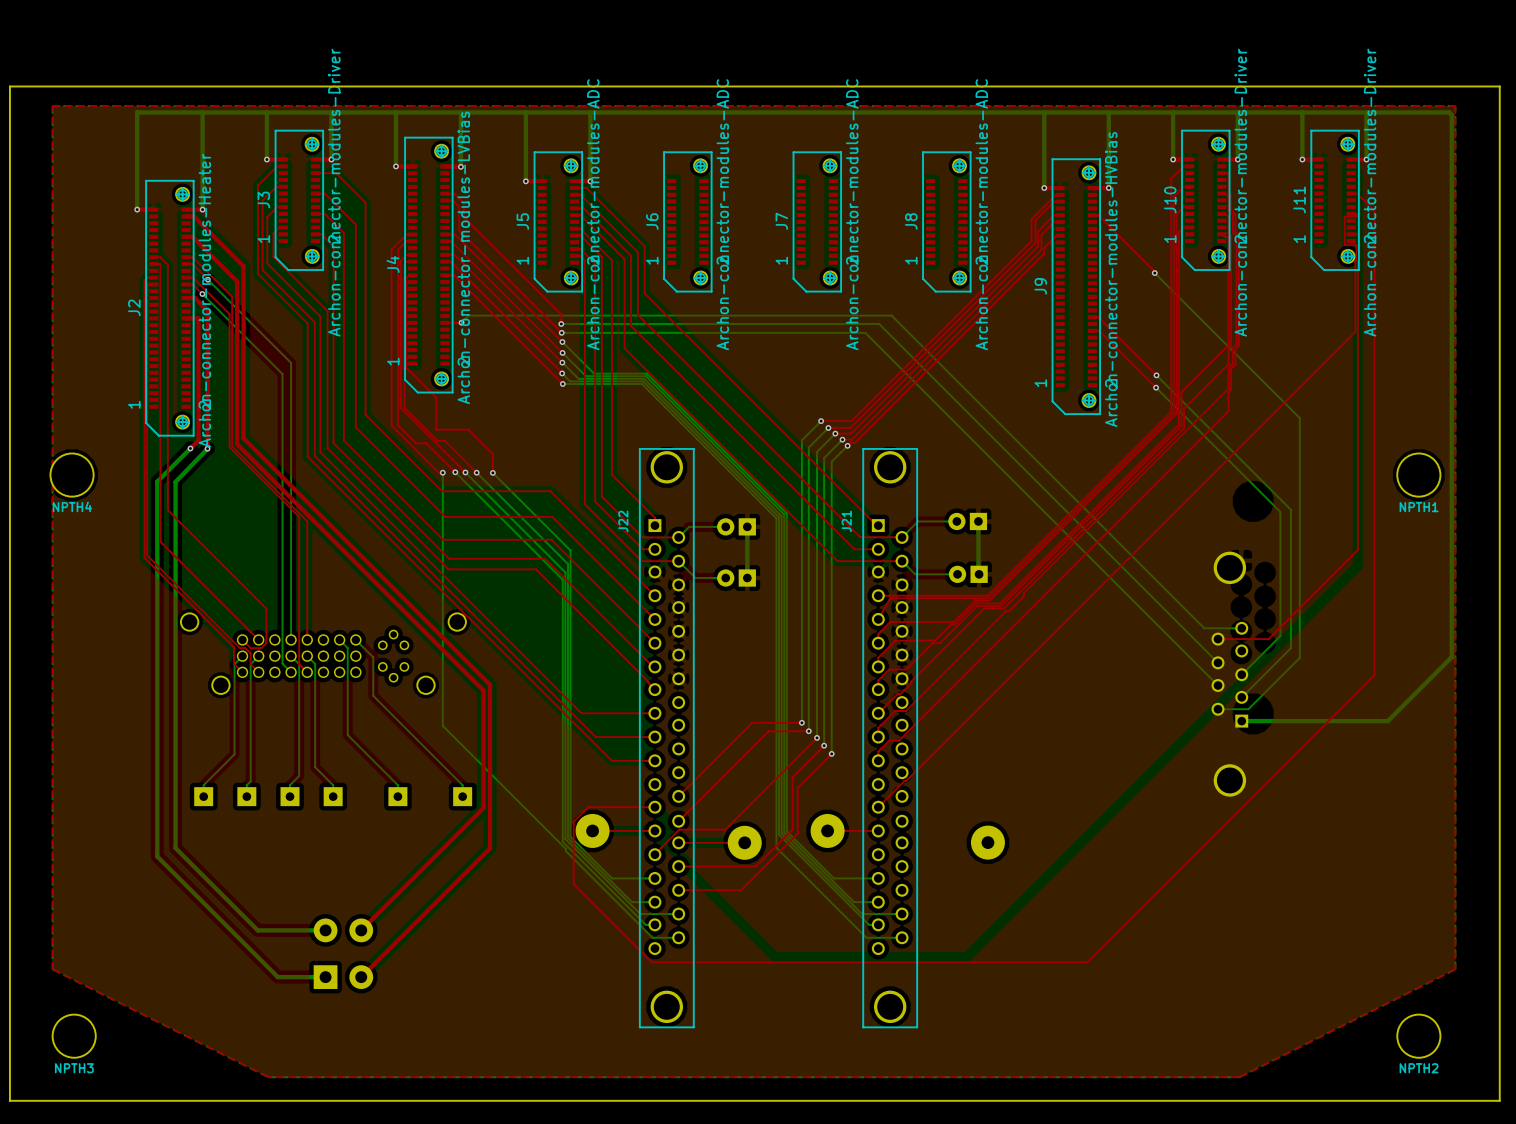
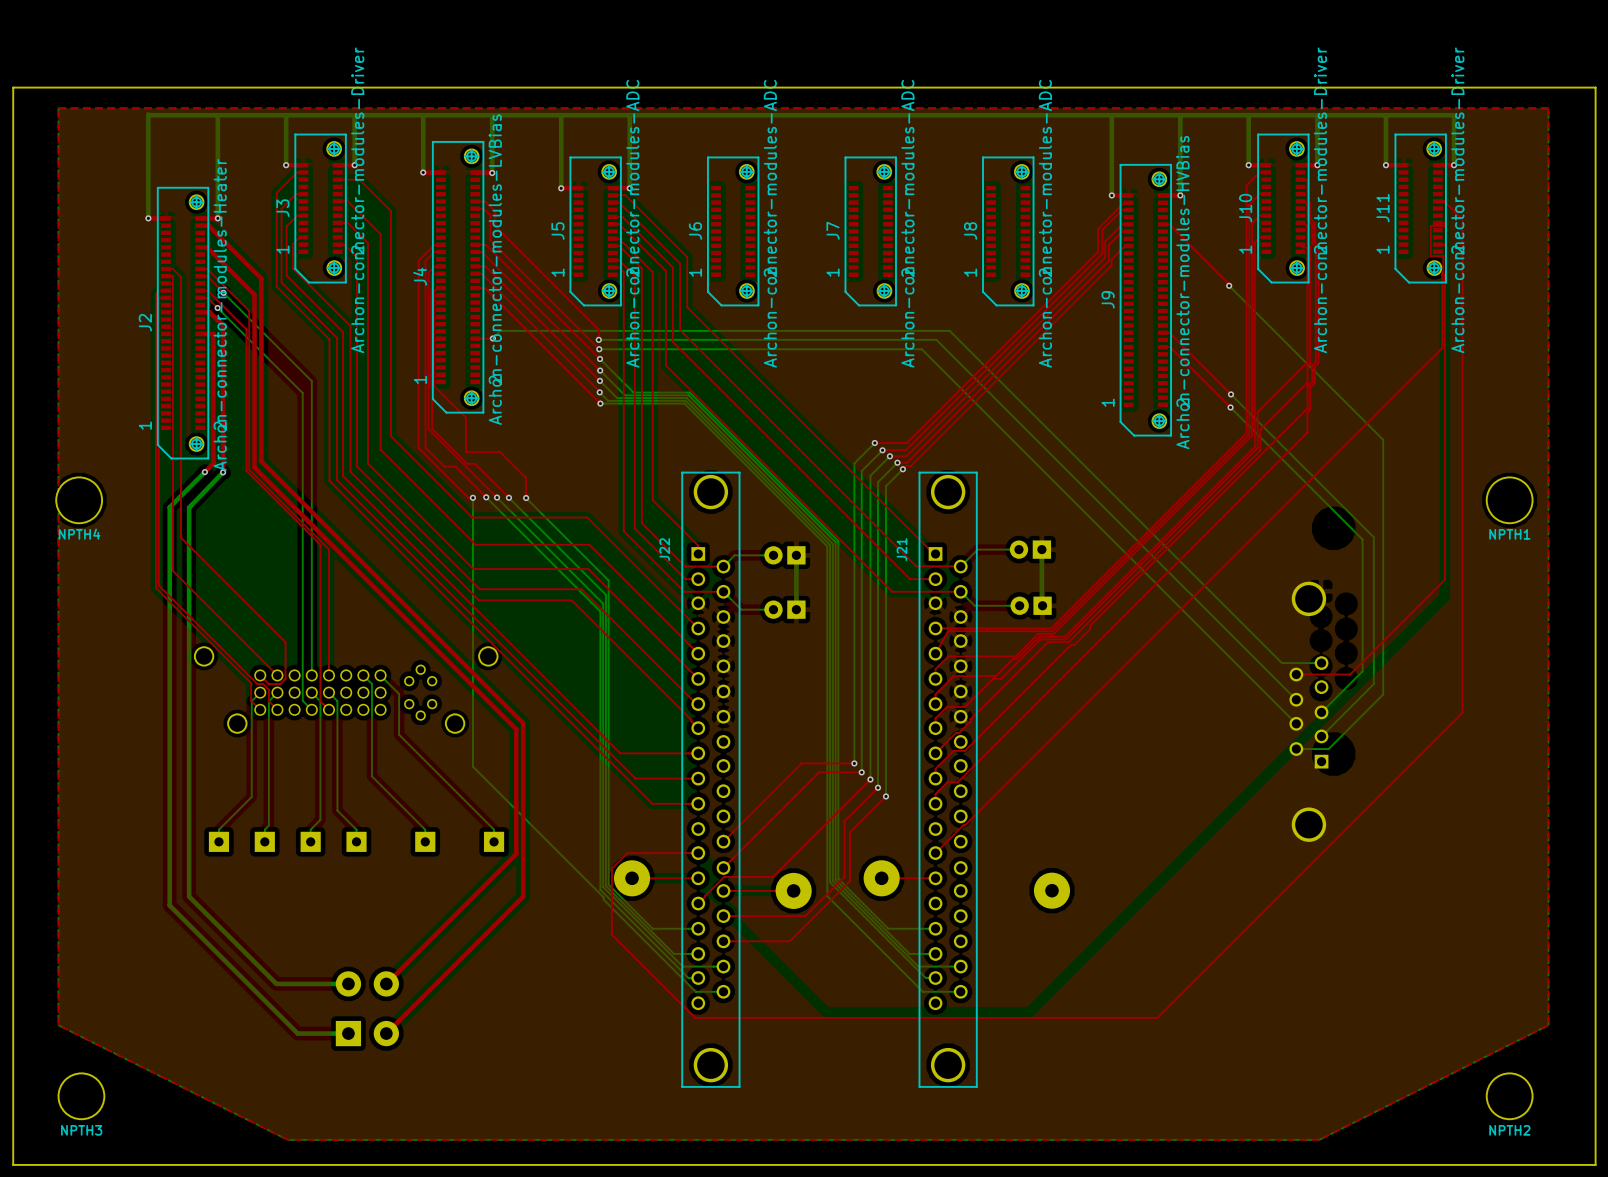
bottom track: (1366, 112) (1449, 112) (1451, 114) (1451, 657) (1387, 721) (1241, 721) -> none

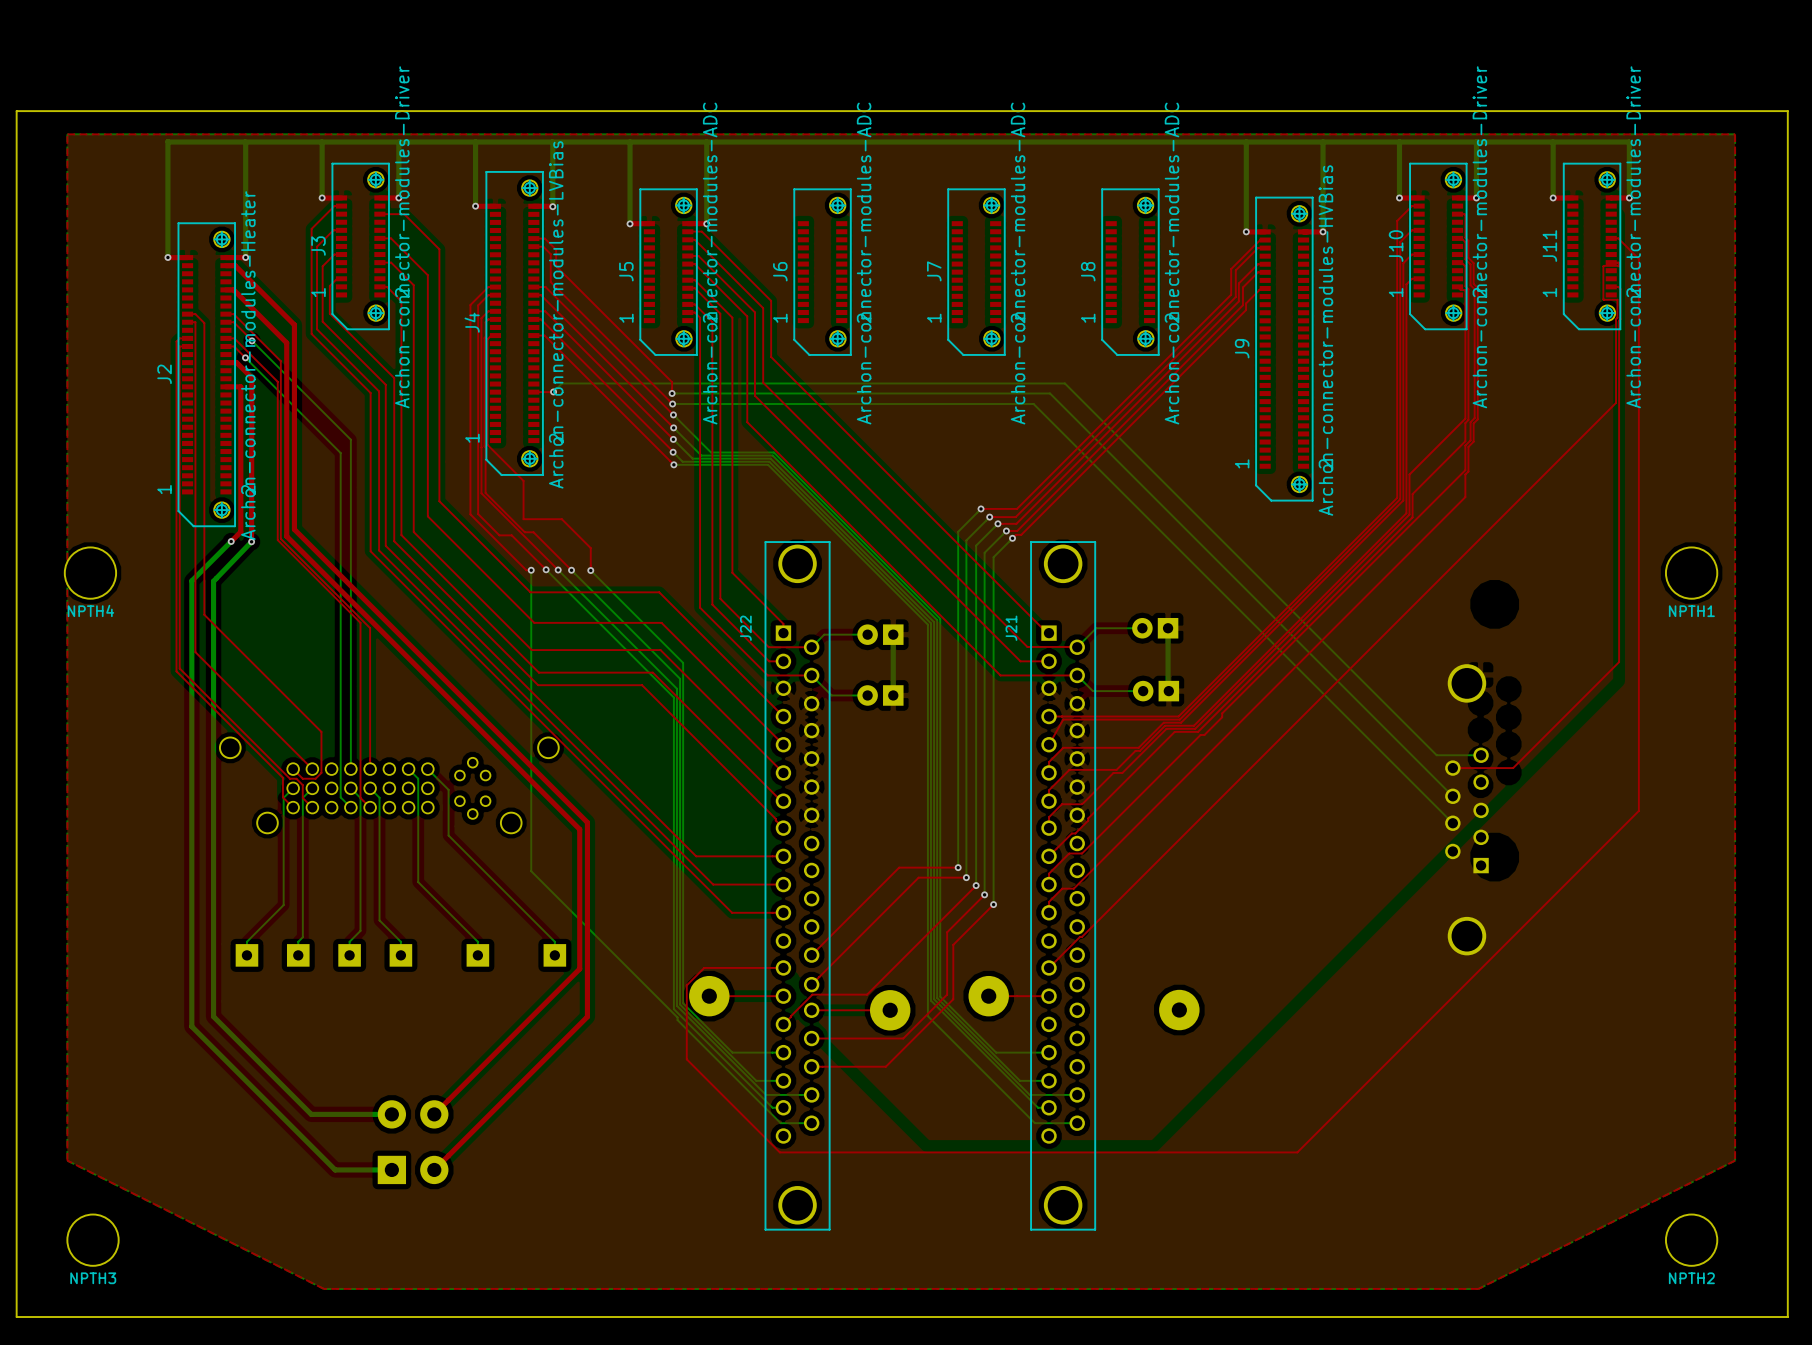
top track: (1162, 224) (1169, 224) (1229, 285) -> none
bottom track: (1229, 285) (1383, 439) (1383, 694) (1328, 749) (1296, 749) -> none
via: (1229, 285) -> none
top track: (1162, 332) (1169, 332) (1231, 394) -> none
top track: (1162, 347) (1170, 347) (1230, 407) -> none
bottom track: (1231, 394) (1373, 537) (1373, 684) (1321, 736) -> none
via: (1231, 394) -> none
bottom track: (1230, 407) (1362, 539) (1362, 671) (1321, 712) -> none
via: (1230, 407) -> none

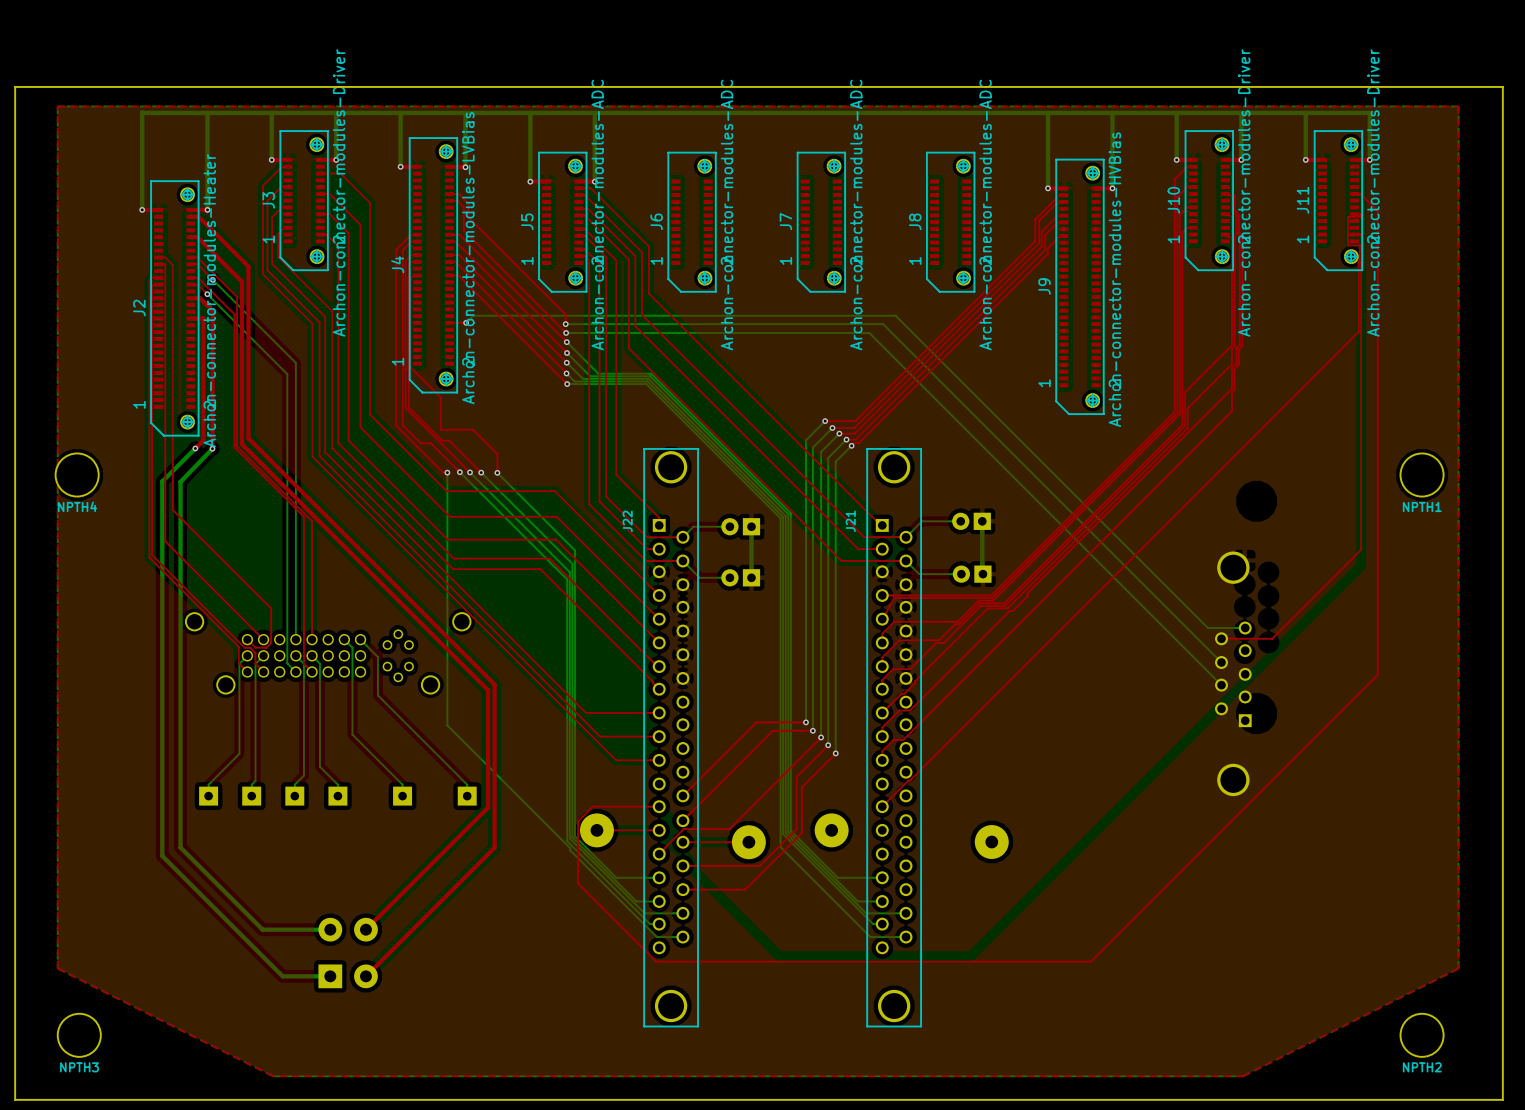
top track: (988, 996) (1049, 996) -> none

